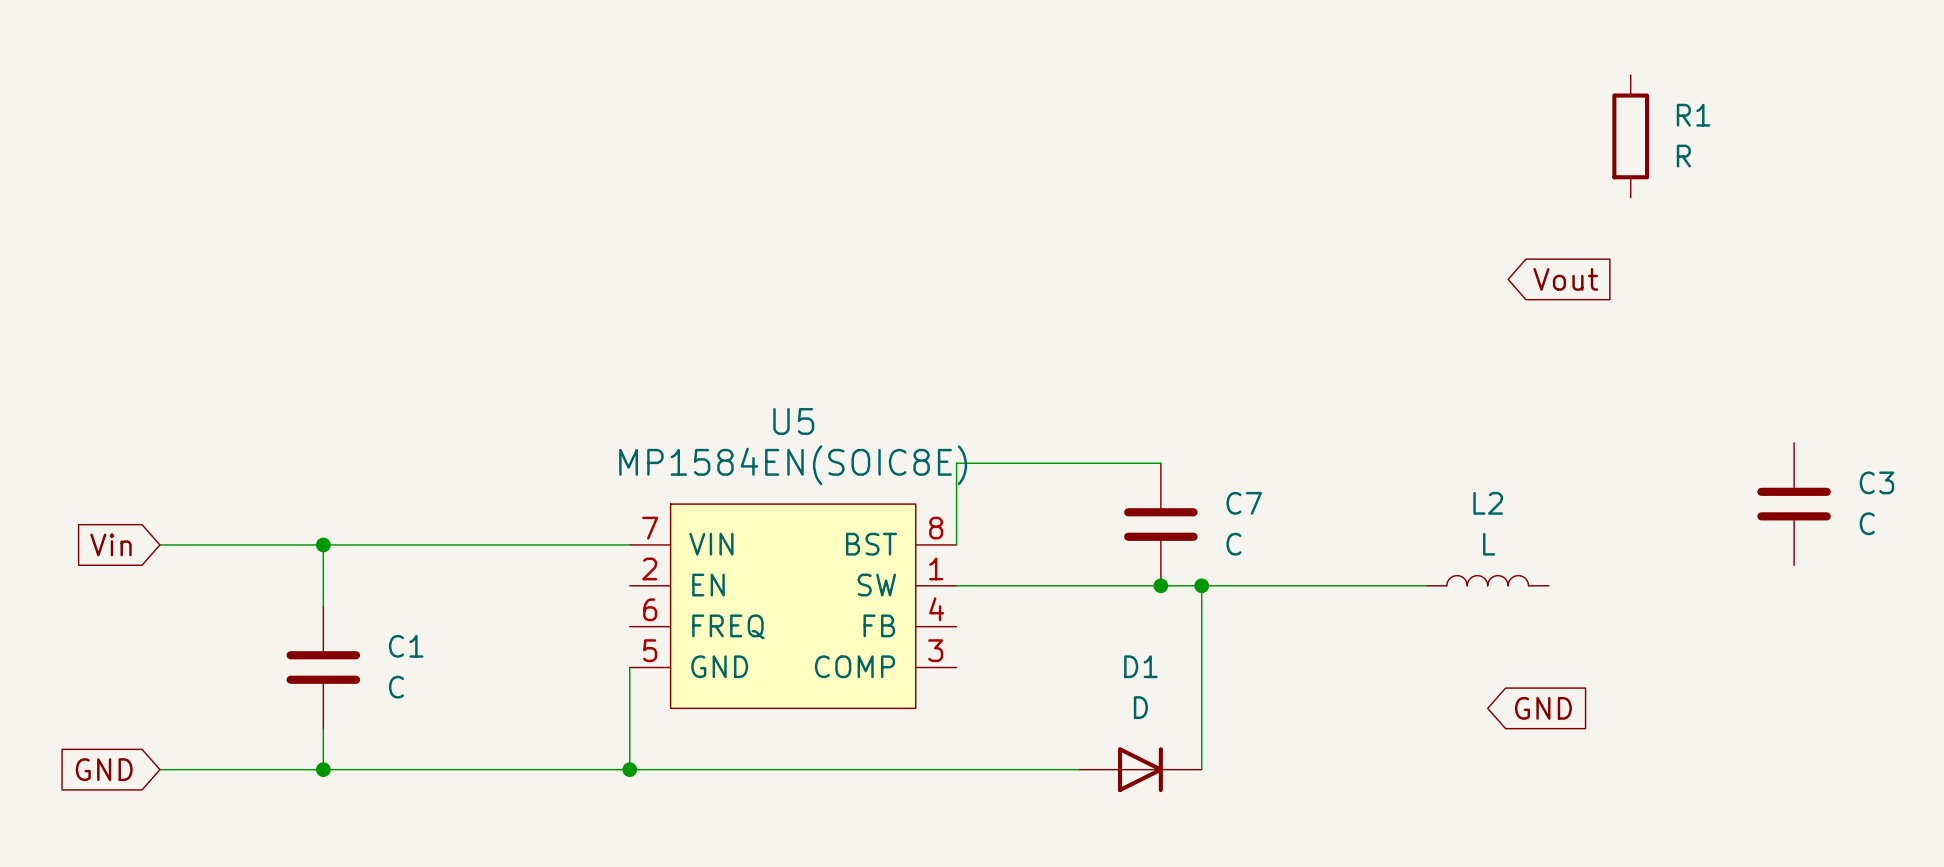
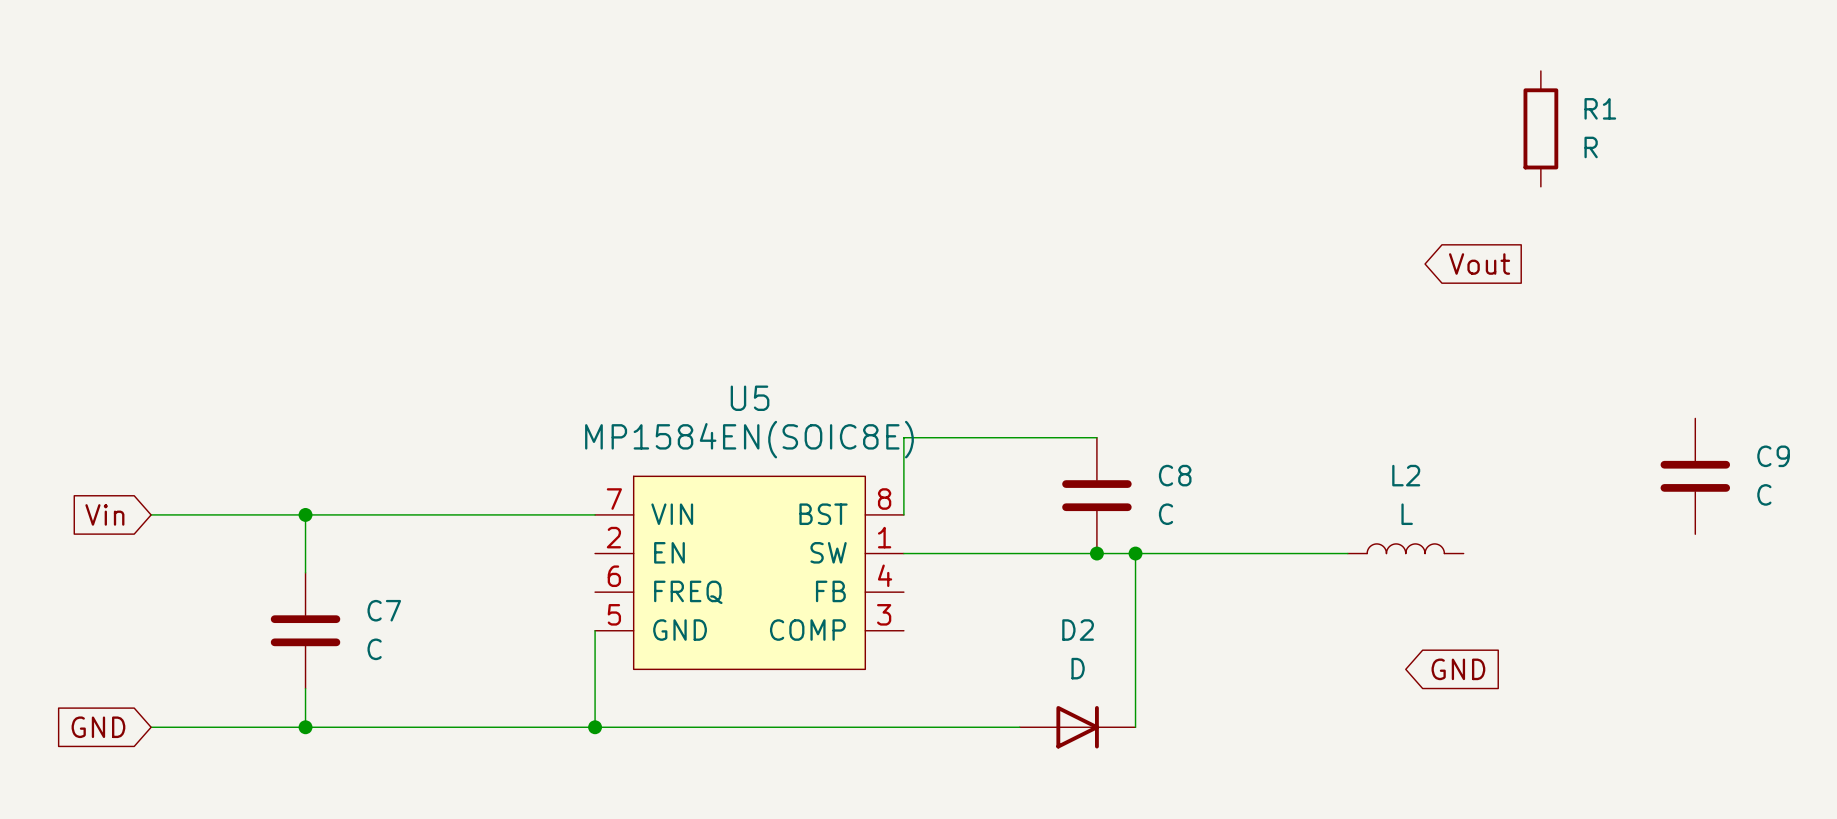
C3 name: C3 (1876, 482) -> C9 (1773, 456)
C7 name: C7 (1244, 503) -> C8 (1175, 475)
C1 name: C1 (406, 646) -> C7 (384, 610)
D1 name: D1 (1140, 666) -> D2 (1078, 630)

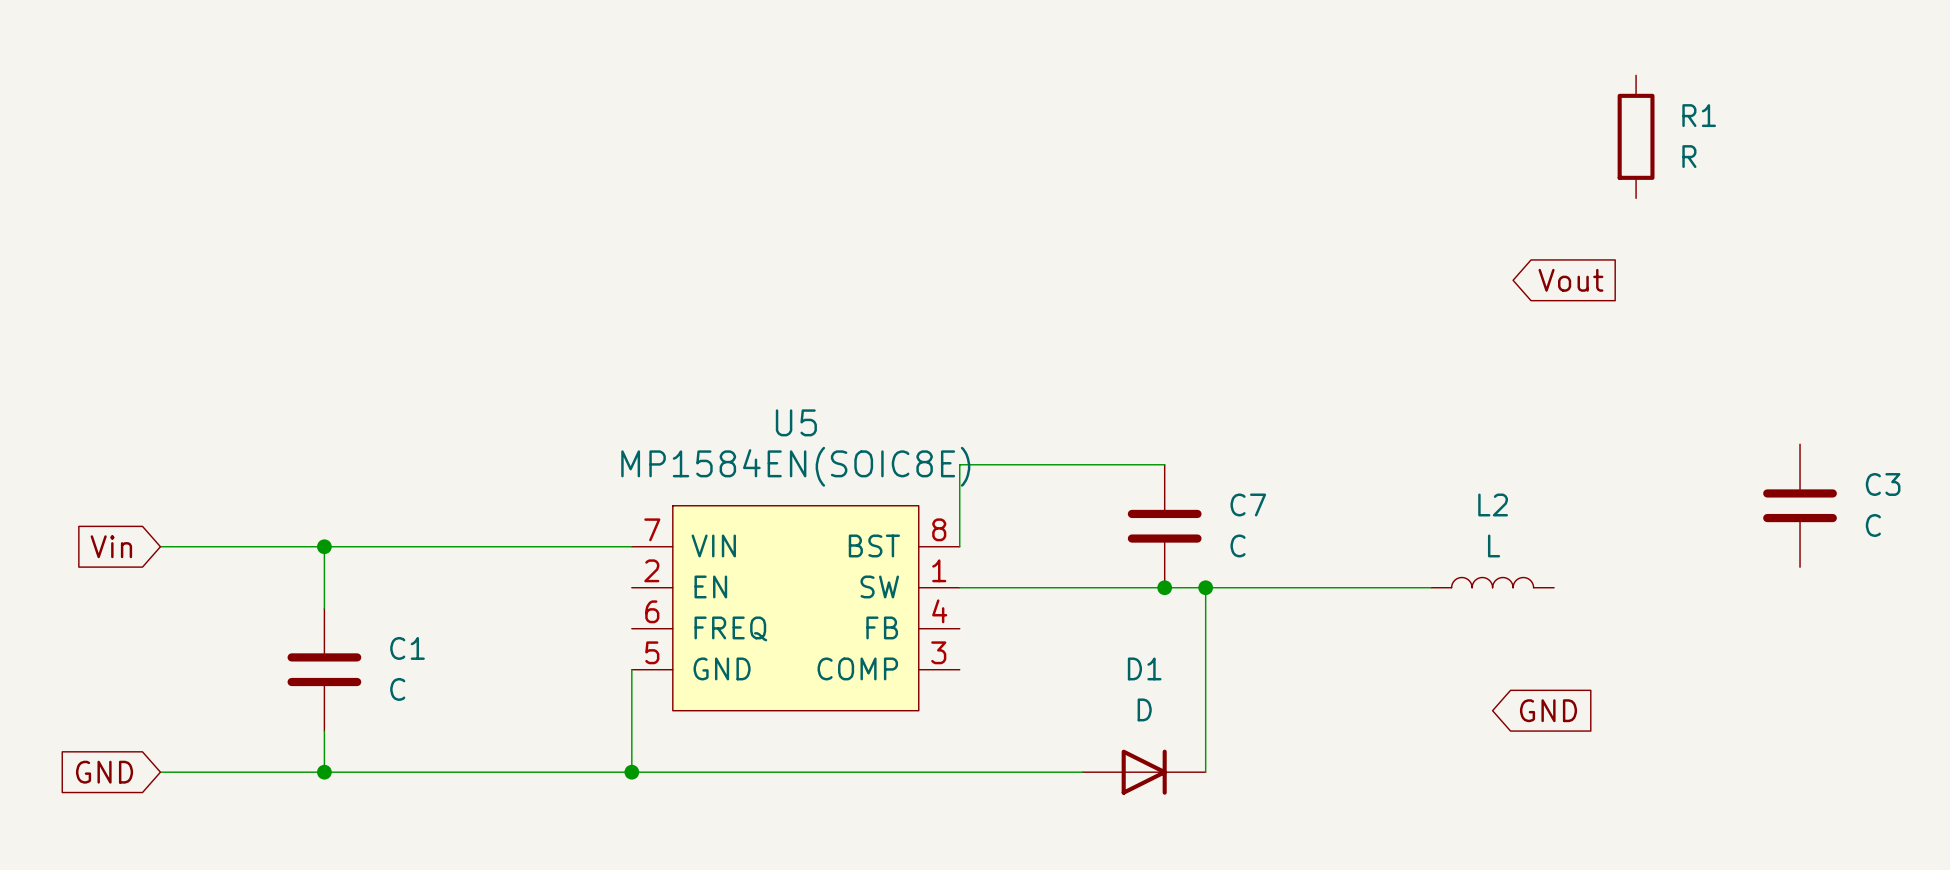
C9 name: C9 (1773, 456) -> C3 (1883, 484)
C8 name: C8 (1175, 475) -> C7 (1248, 504)
C7 name: C7 (384, 610) -> C1 (407, 648)
D2 name: D2 (1078, 630) -> D1 (1144, 668)

